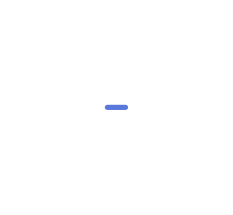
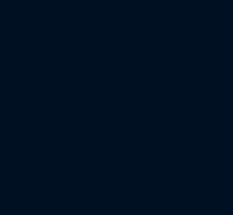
track: (125, 107) (107, 107) -> none

